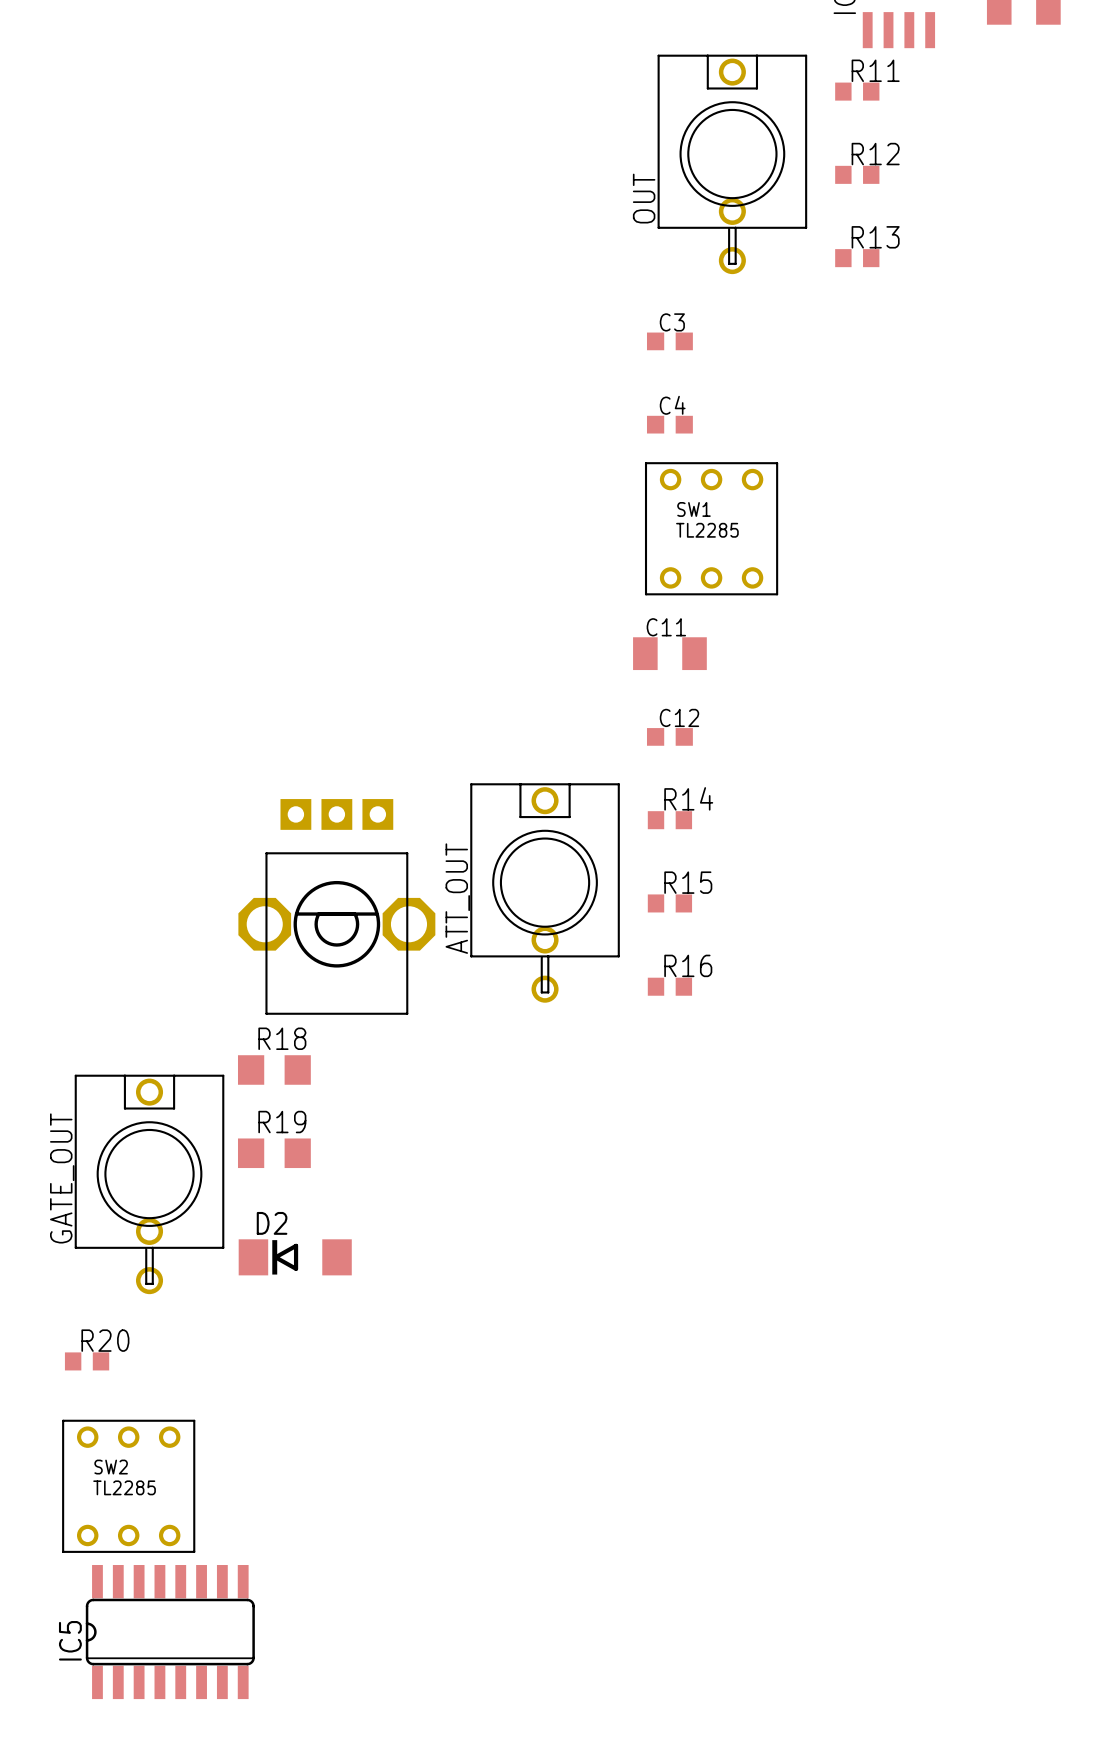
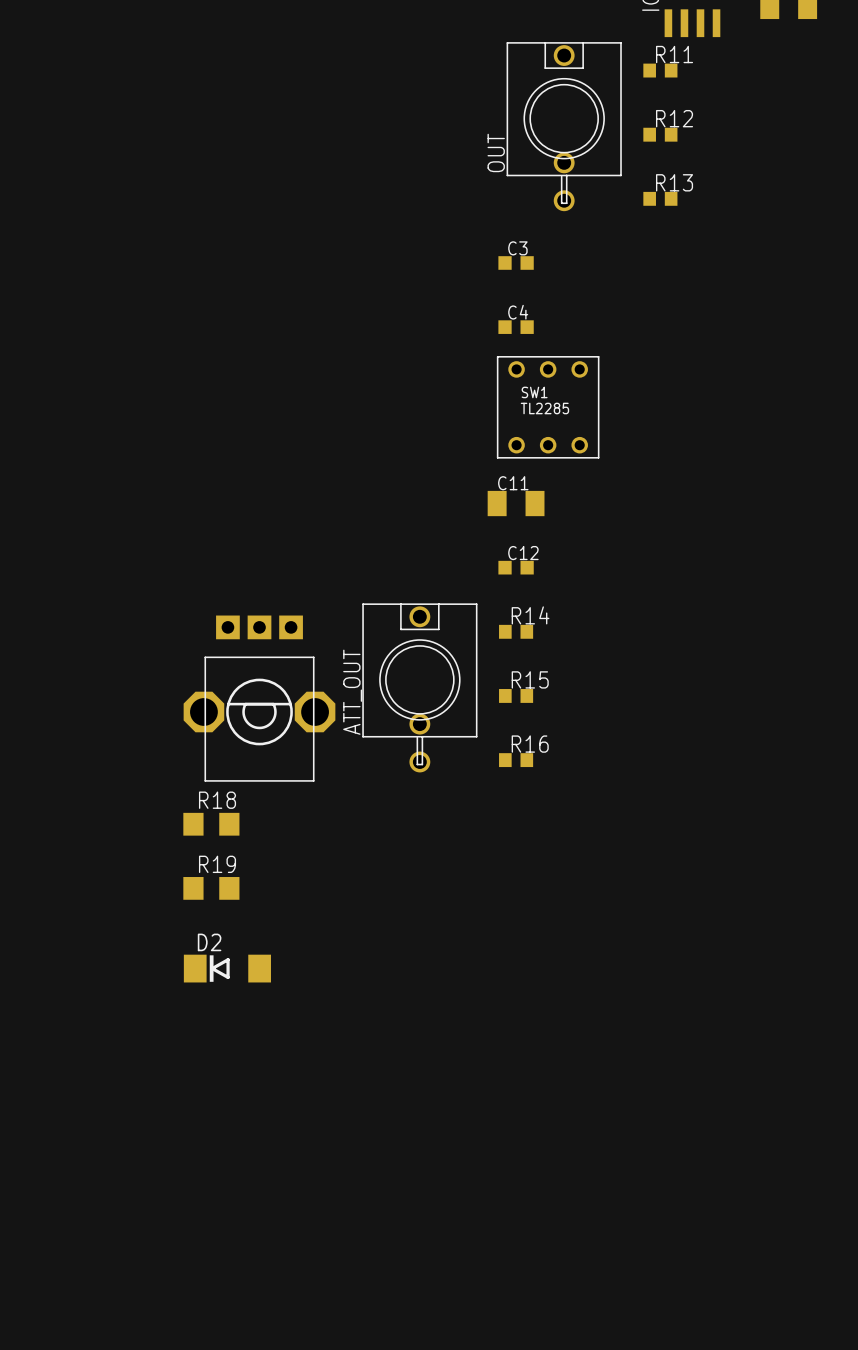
GATE_OUT: (149, 1184) -> none
R20: (87, 1361) -> none
SW2: TL2285 (128, 1486) -> none
IC5: (170, 1632) -> none

